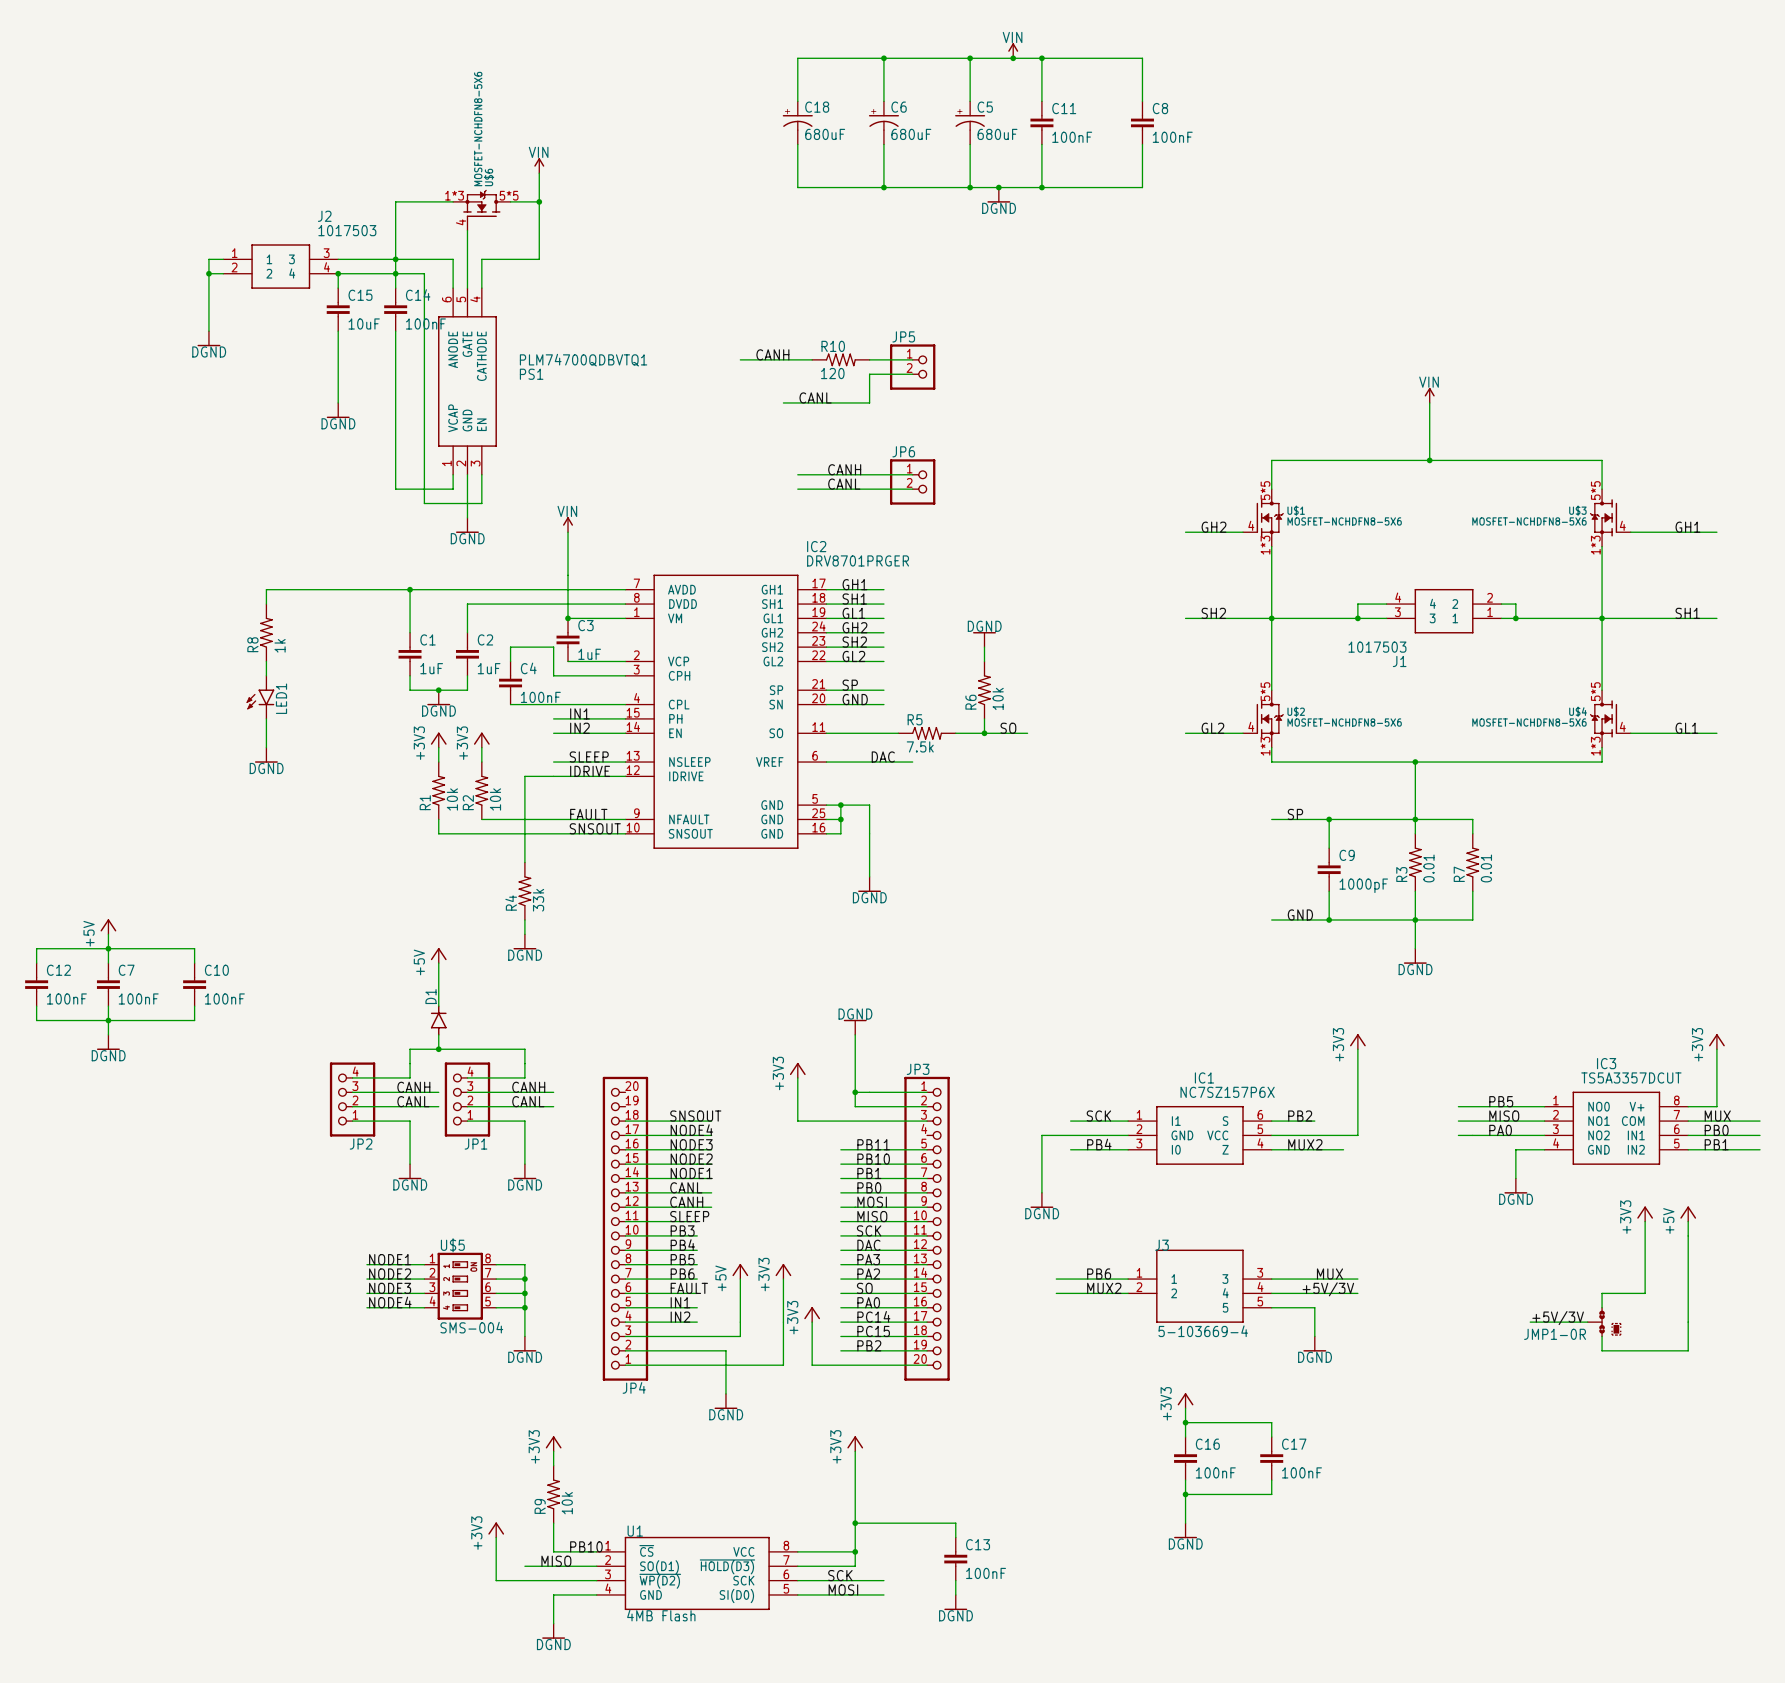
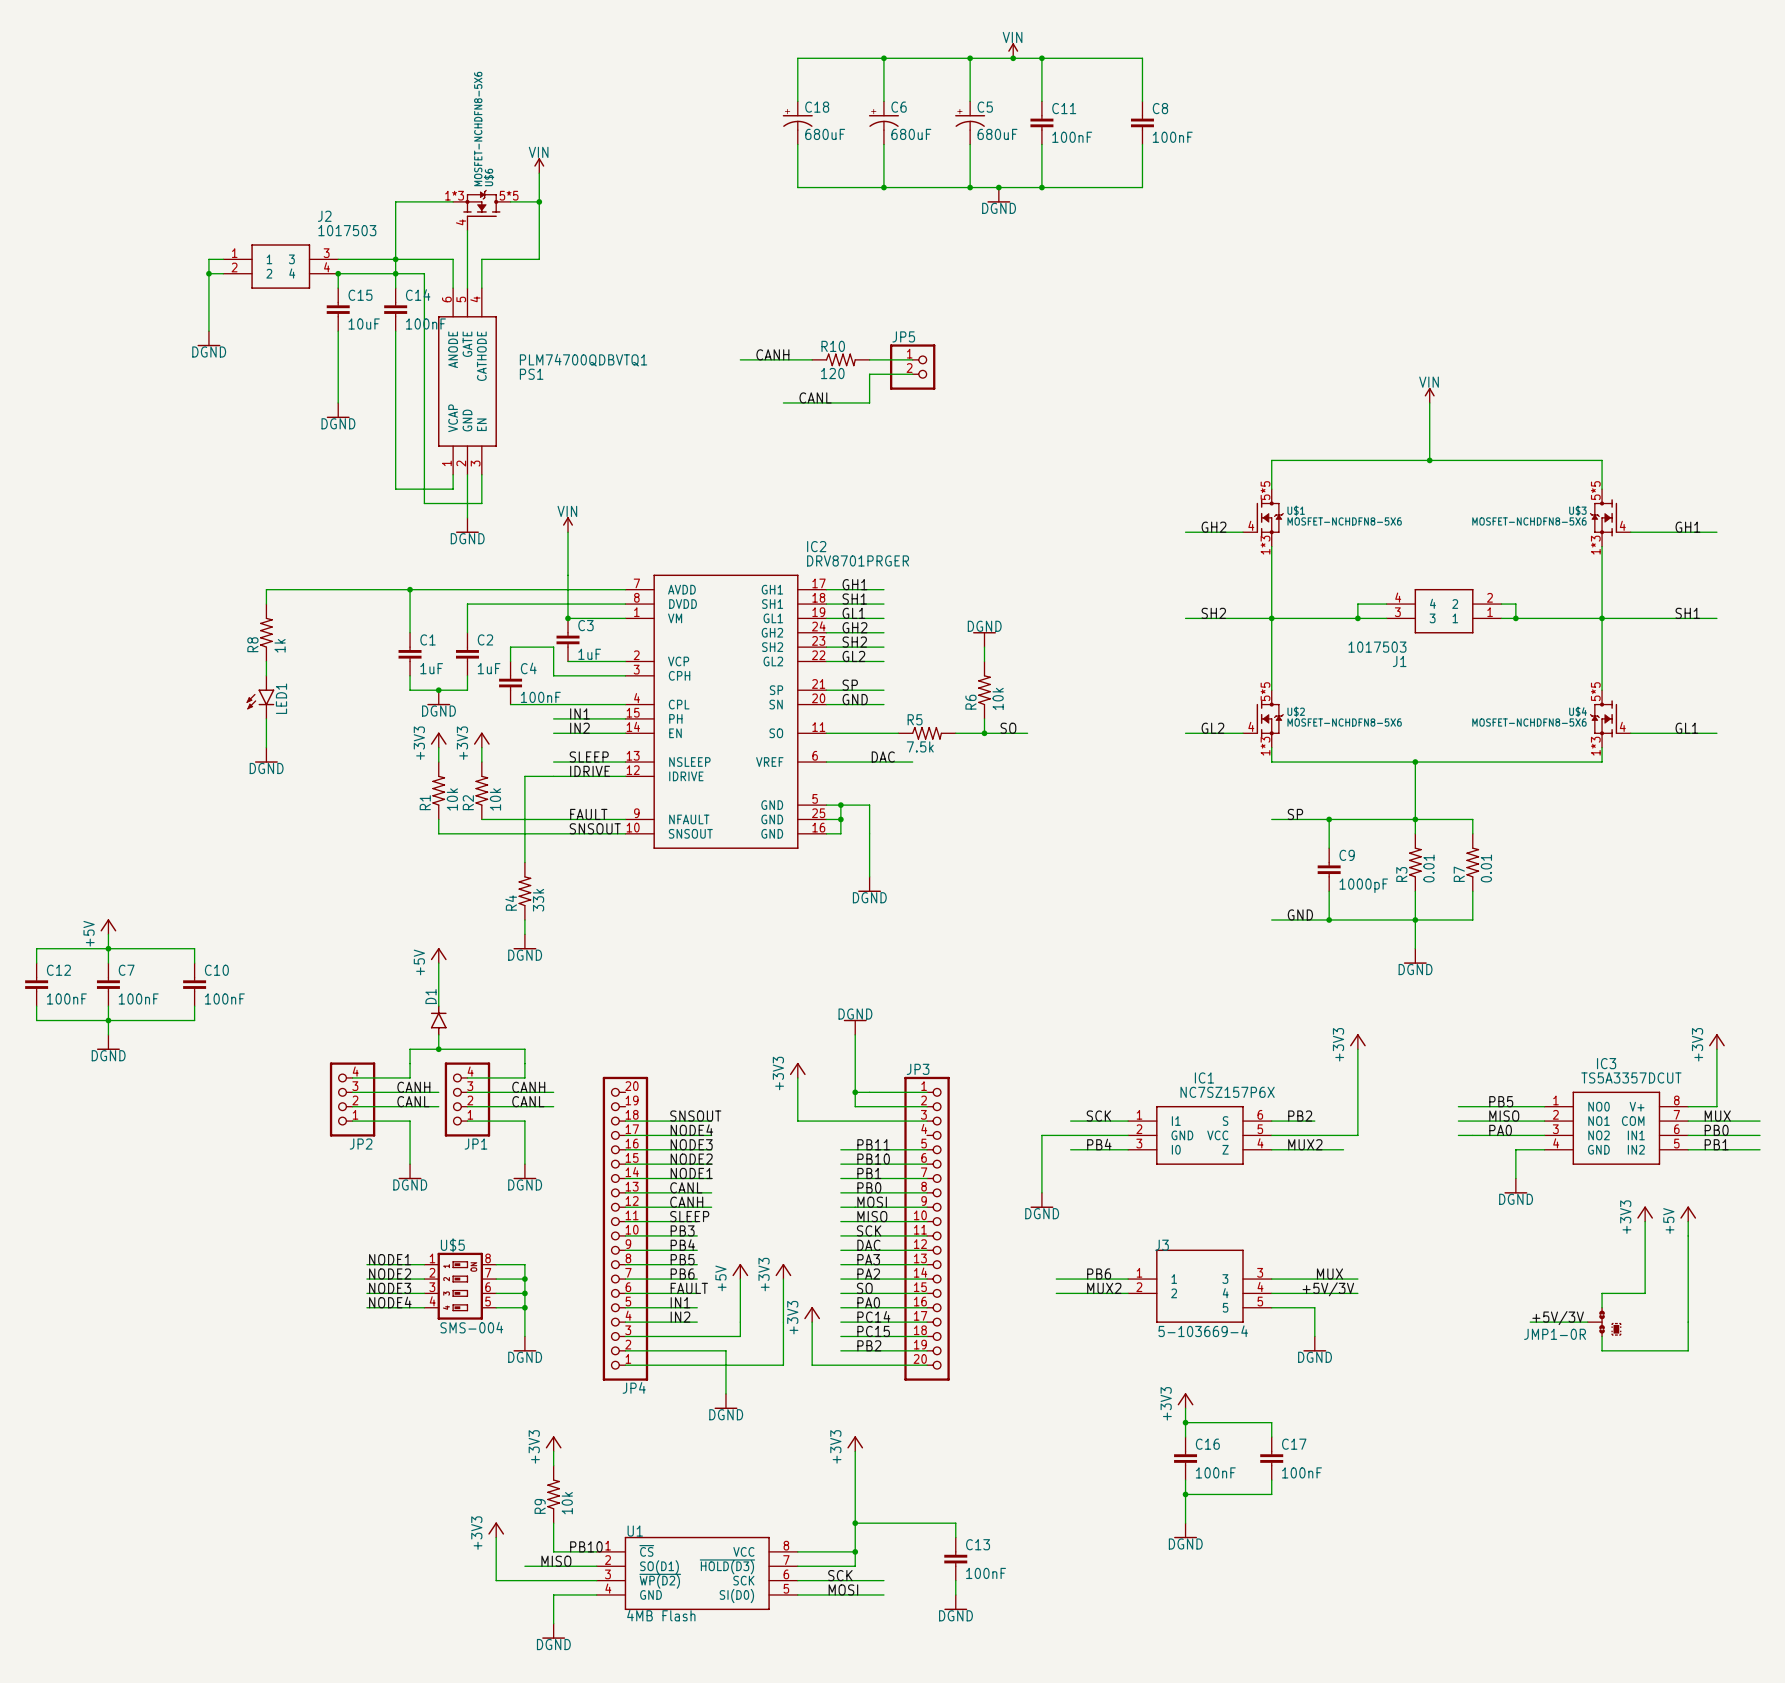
label: CANH (844, 469) -> none
wire: (797, 474) (912, 474) -> none
JP6: (912, 481) -> none
label: CANL (844, 484) -> none
wire: (797, 489) (912, 489) -> none

